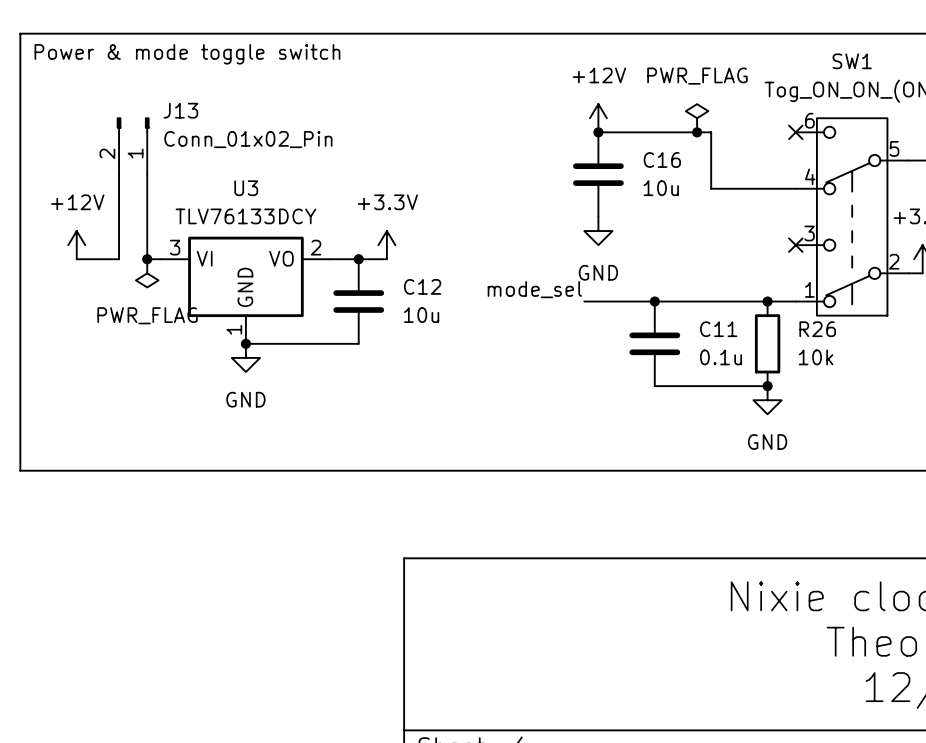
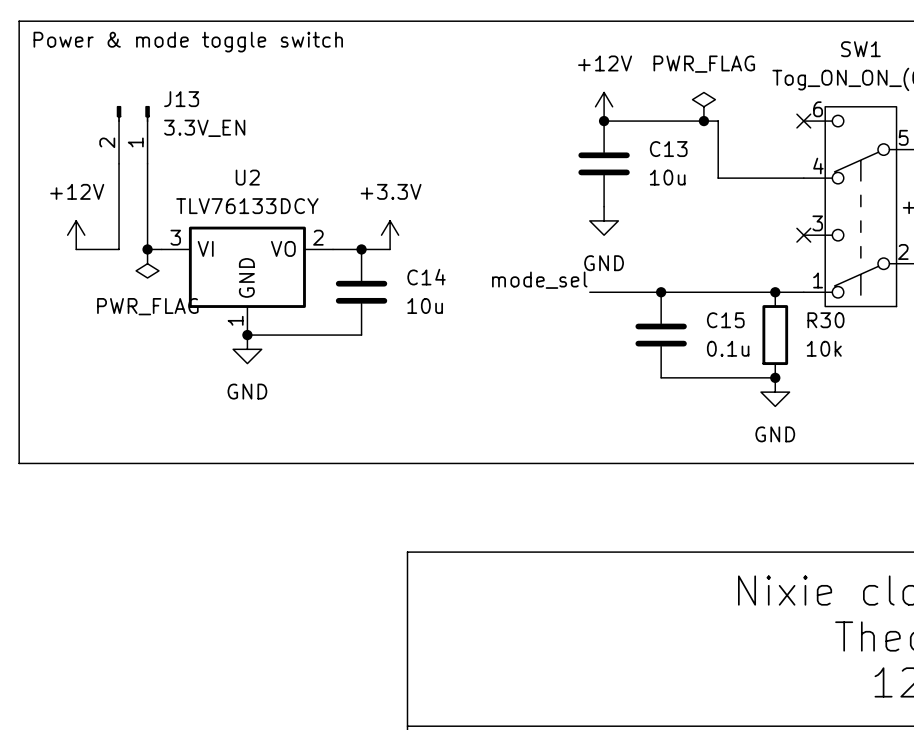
J13 value: Conn_01x02_Pin (248, 139) -> 3.3V_EN (204, 128)
C16 name: C16 (662, 160) -> C13 (668, 149)
U3 name: U3 (246, 188) -> U2 (247, 177)
C12 name: C12 (422, 286) -> C14 (426, 277)
C11 name: C11 (718, 329) -> C15 (725, 320)
R26 name: R26 (817, 329) -> R30 (825, 320)

